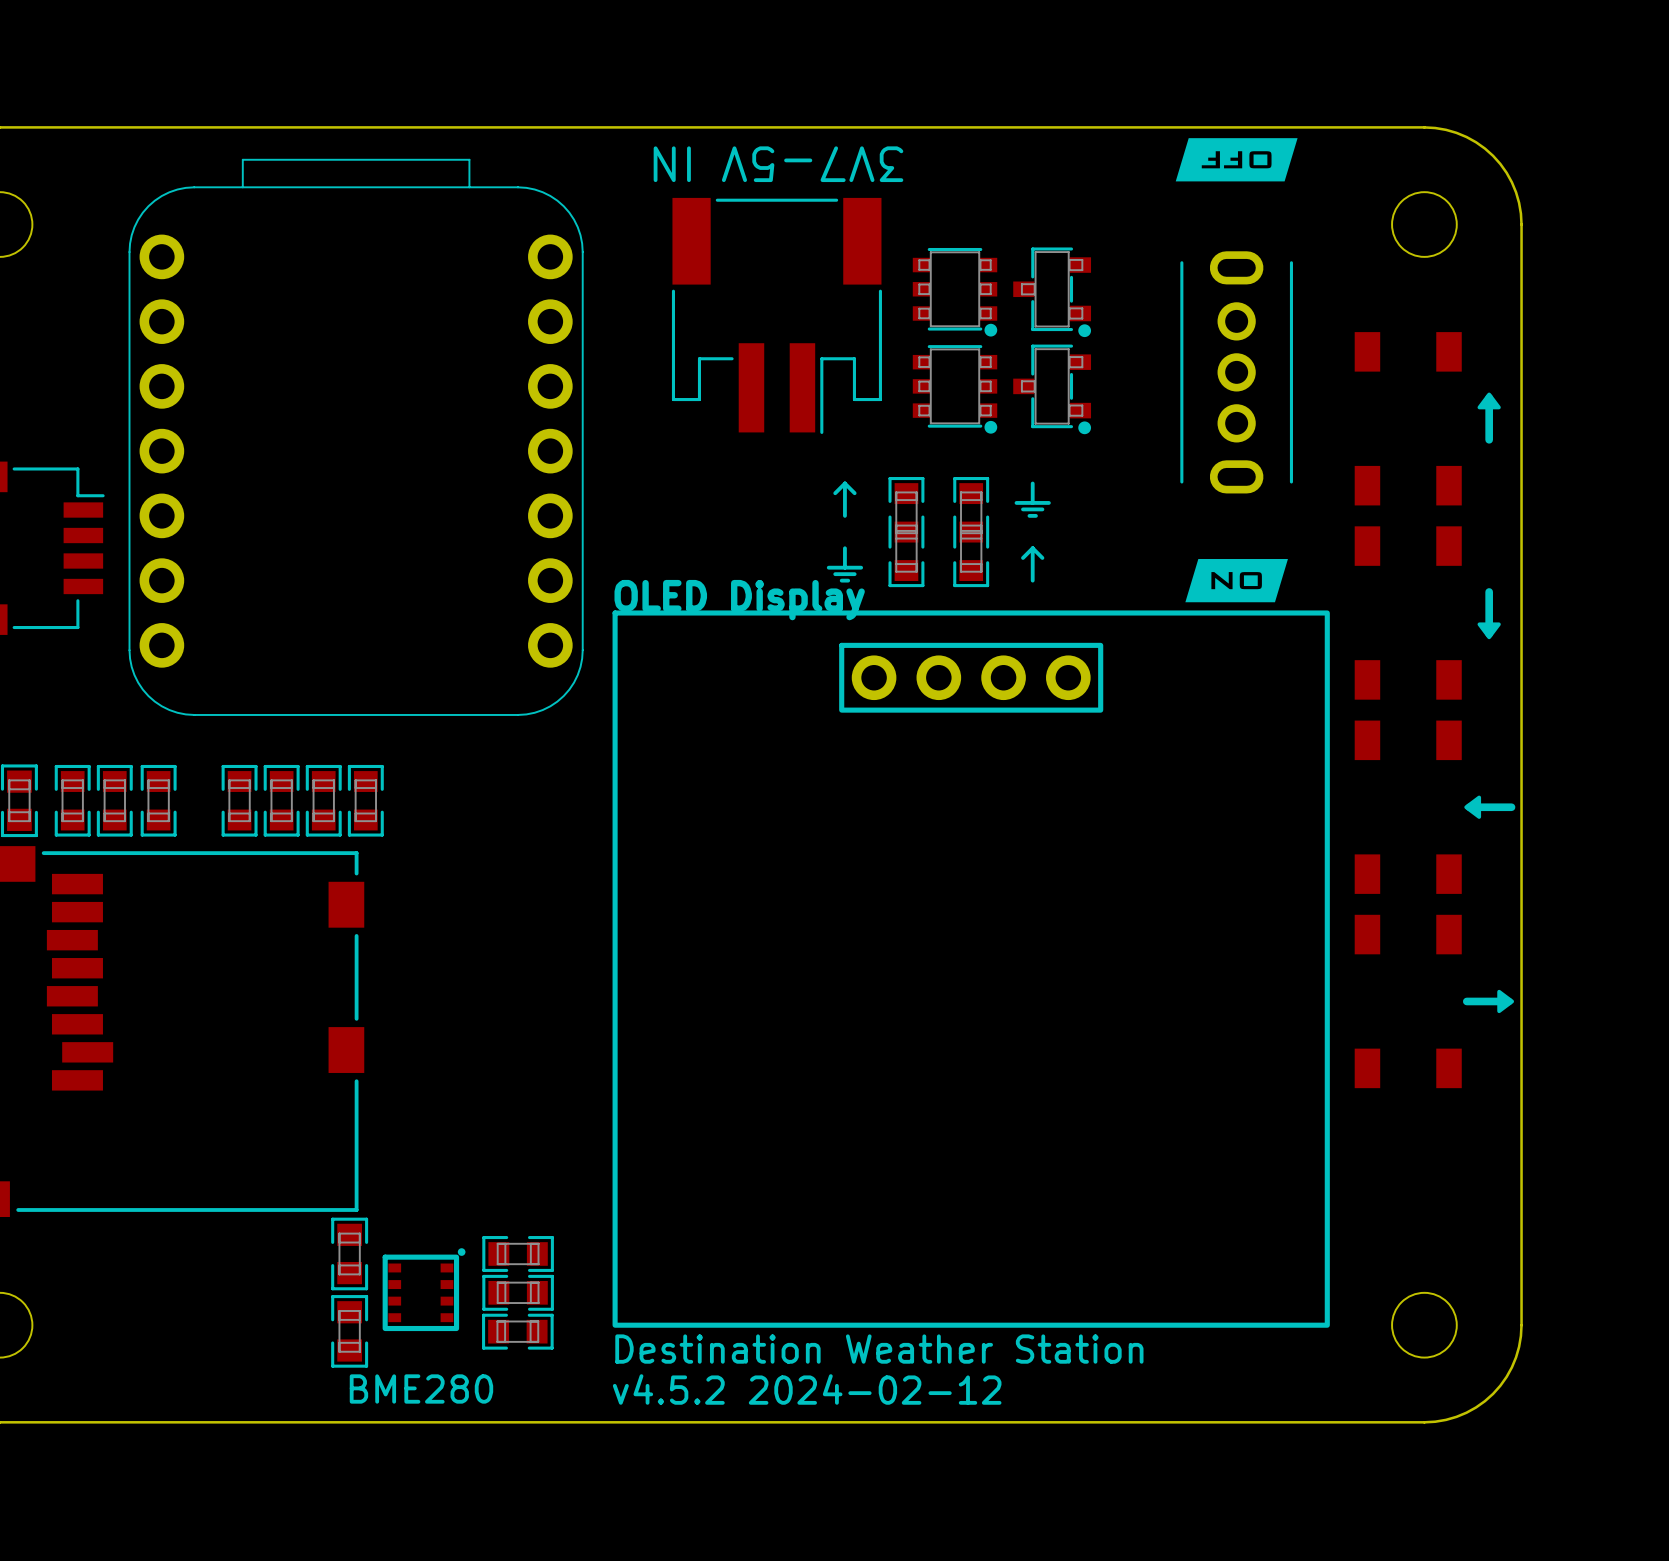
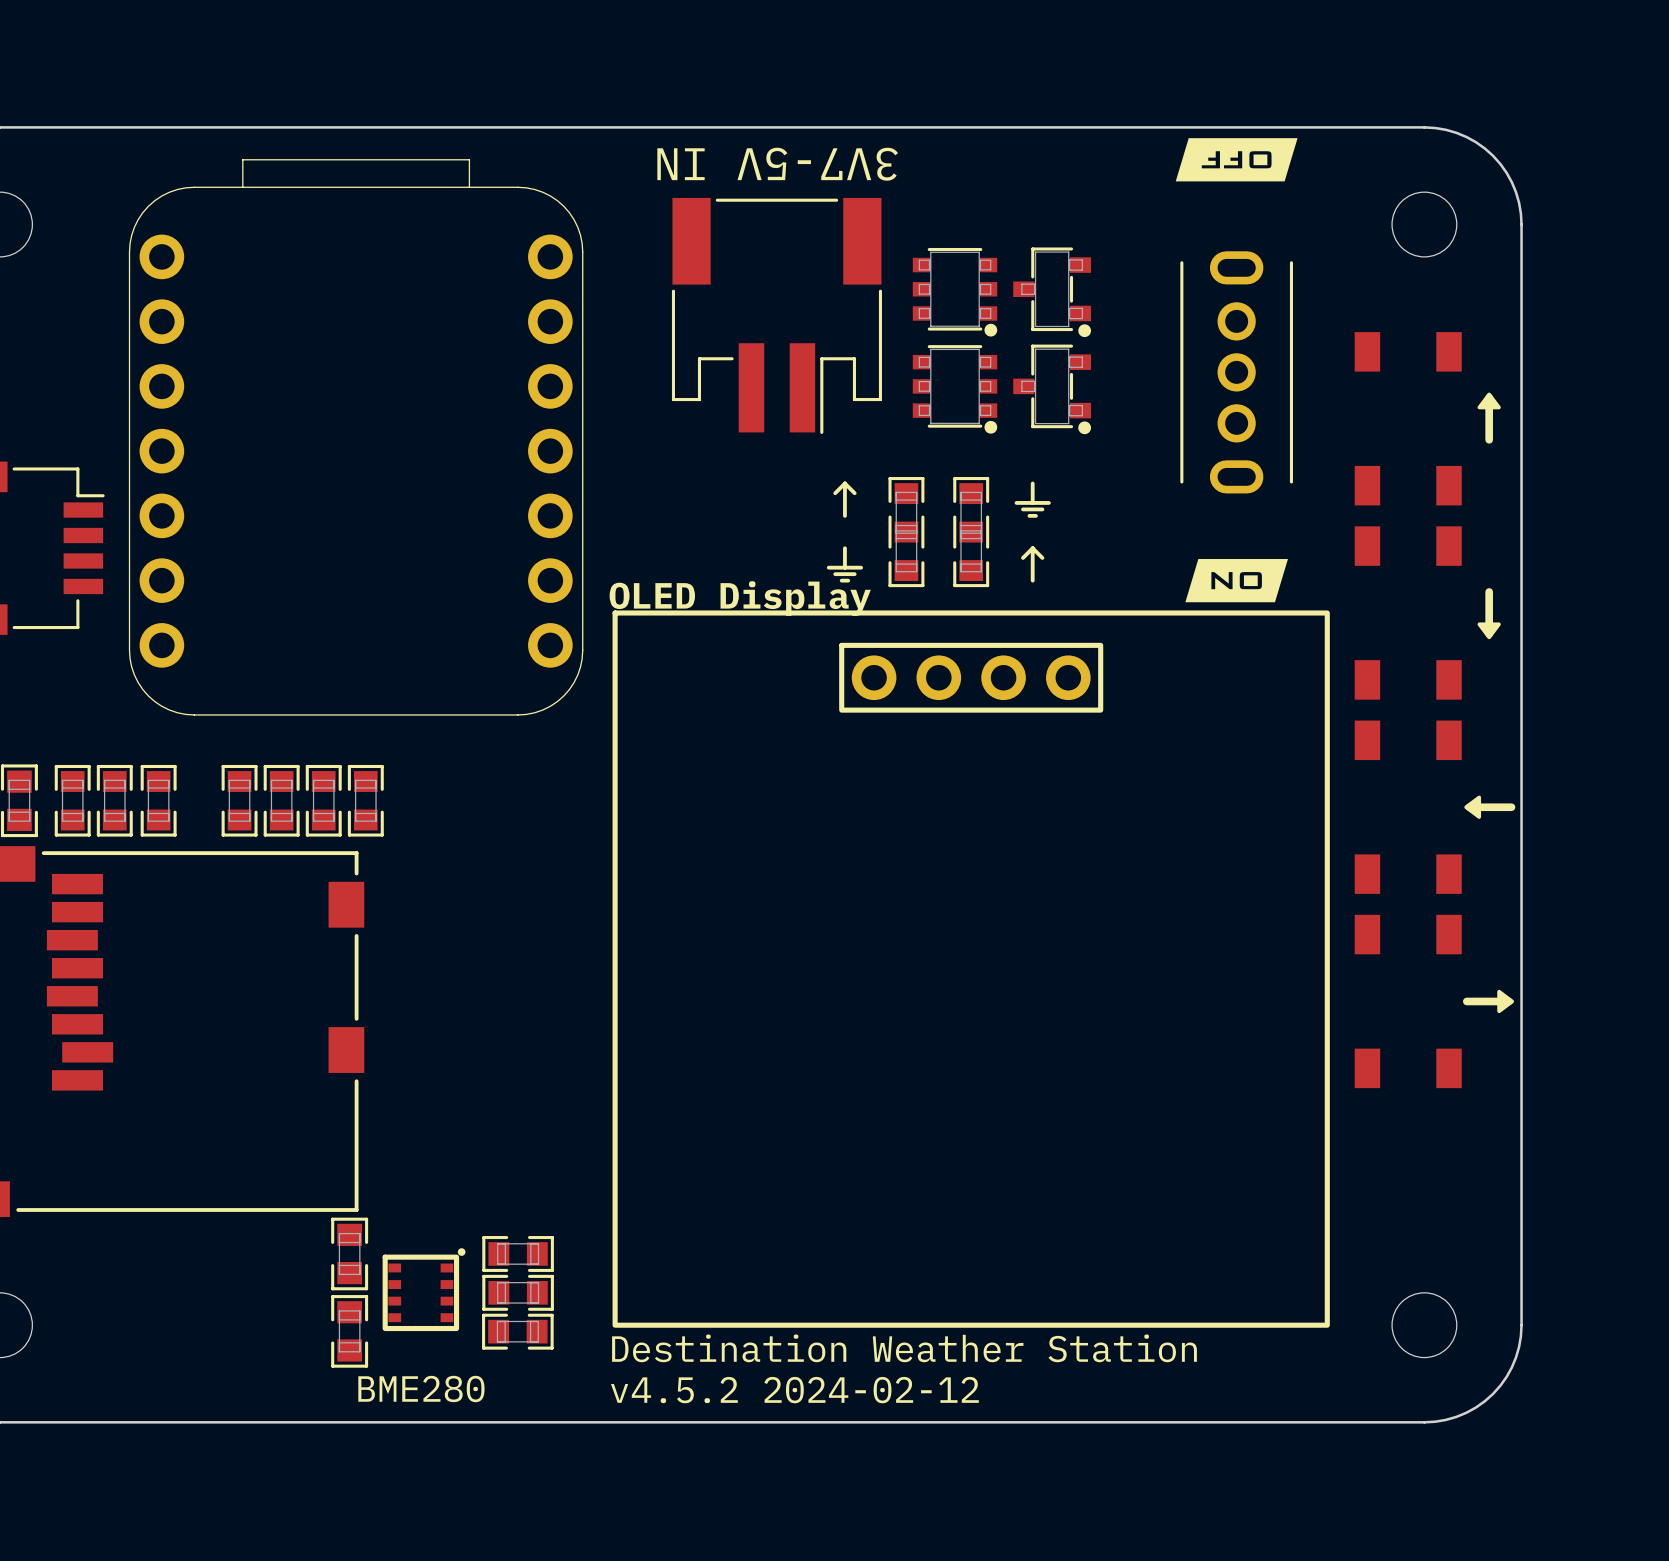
part rotation: 0° (971, 532) -> 180° (971, 532)

